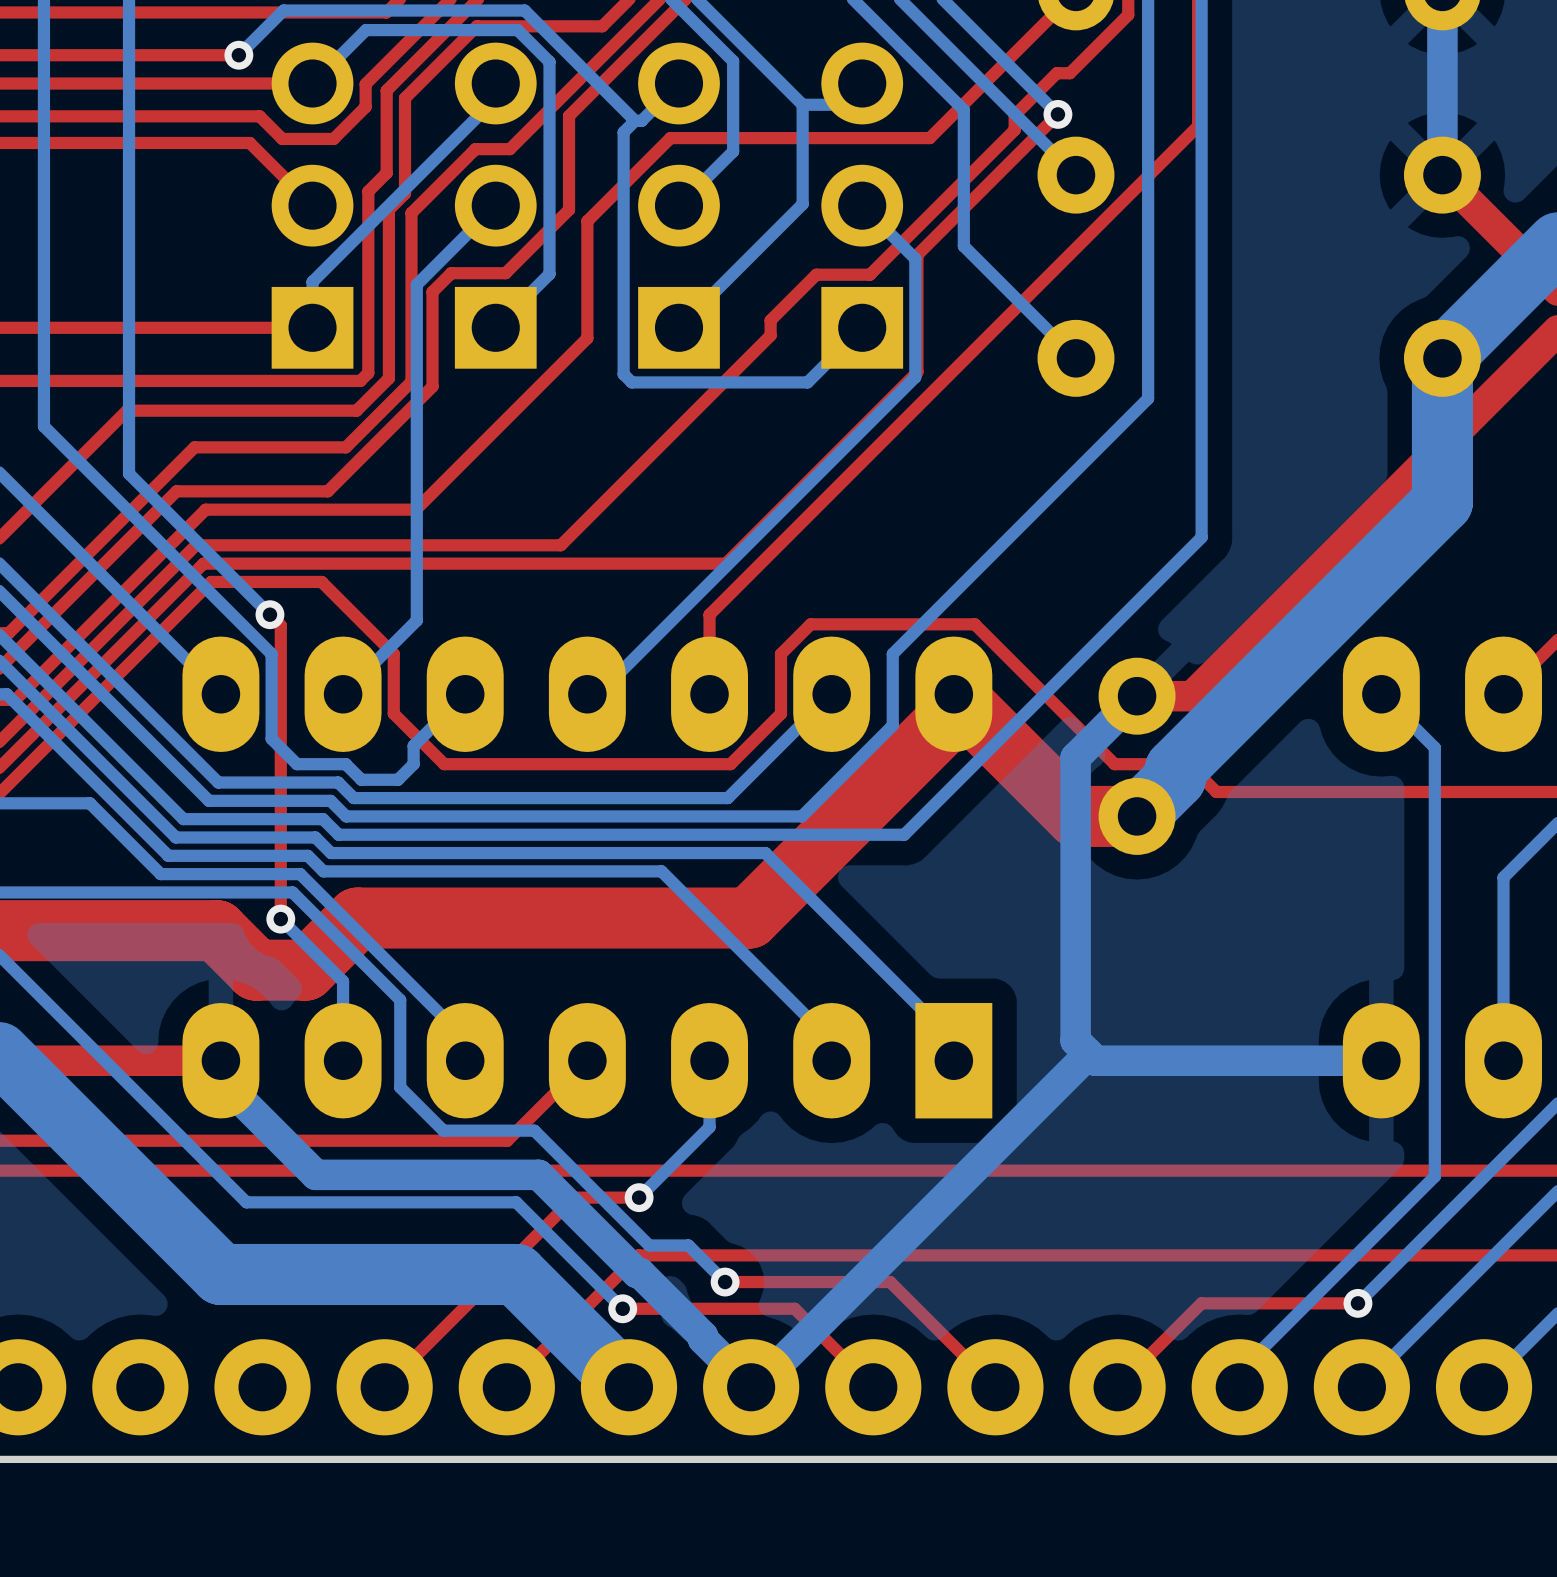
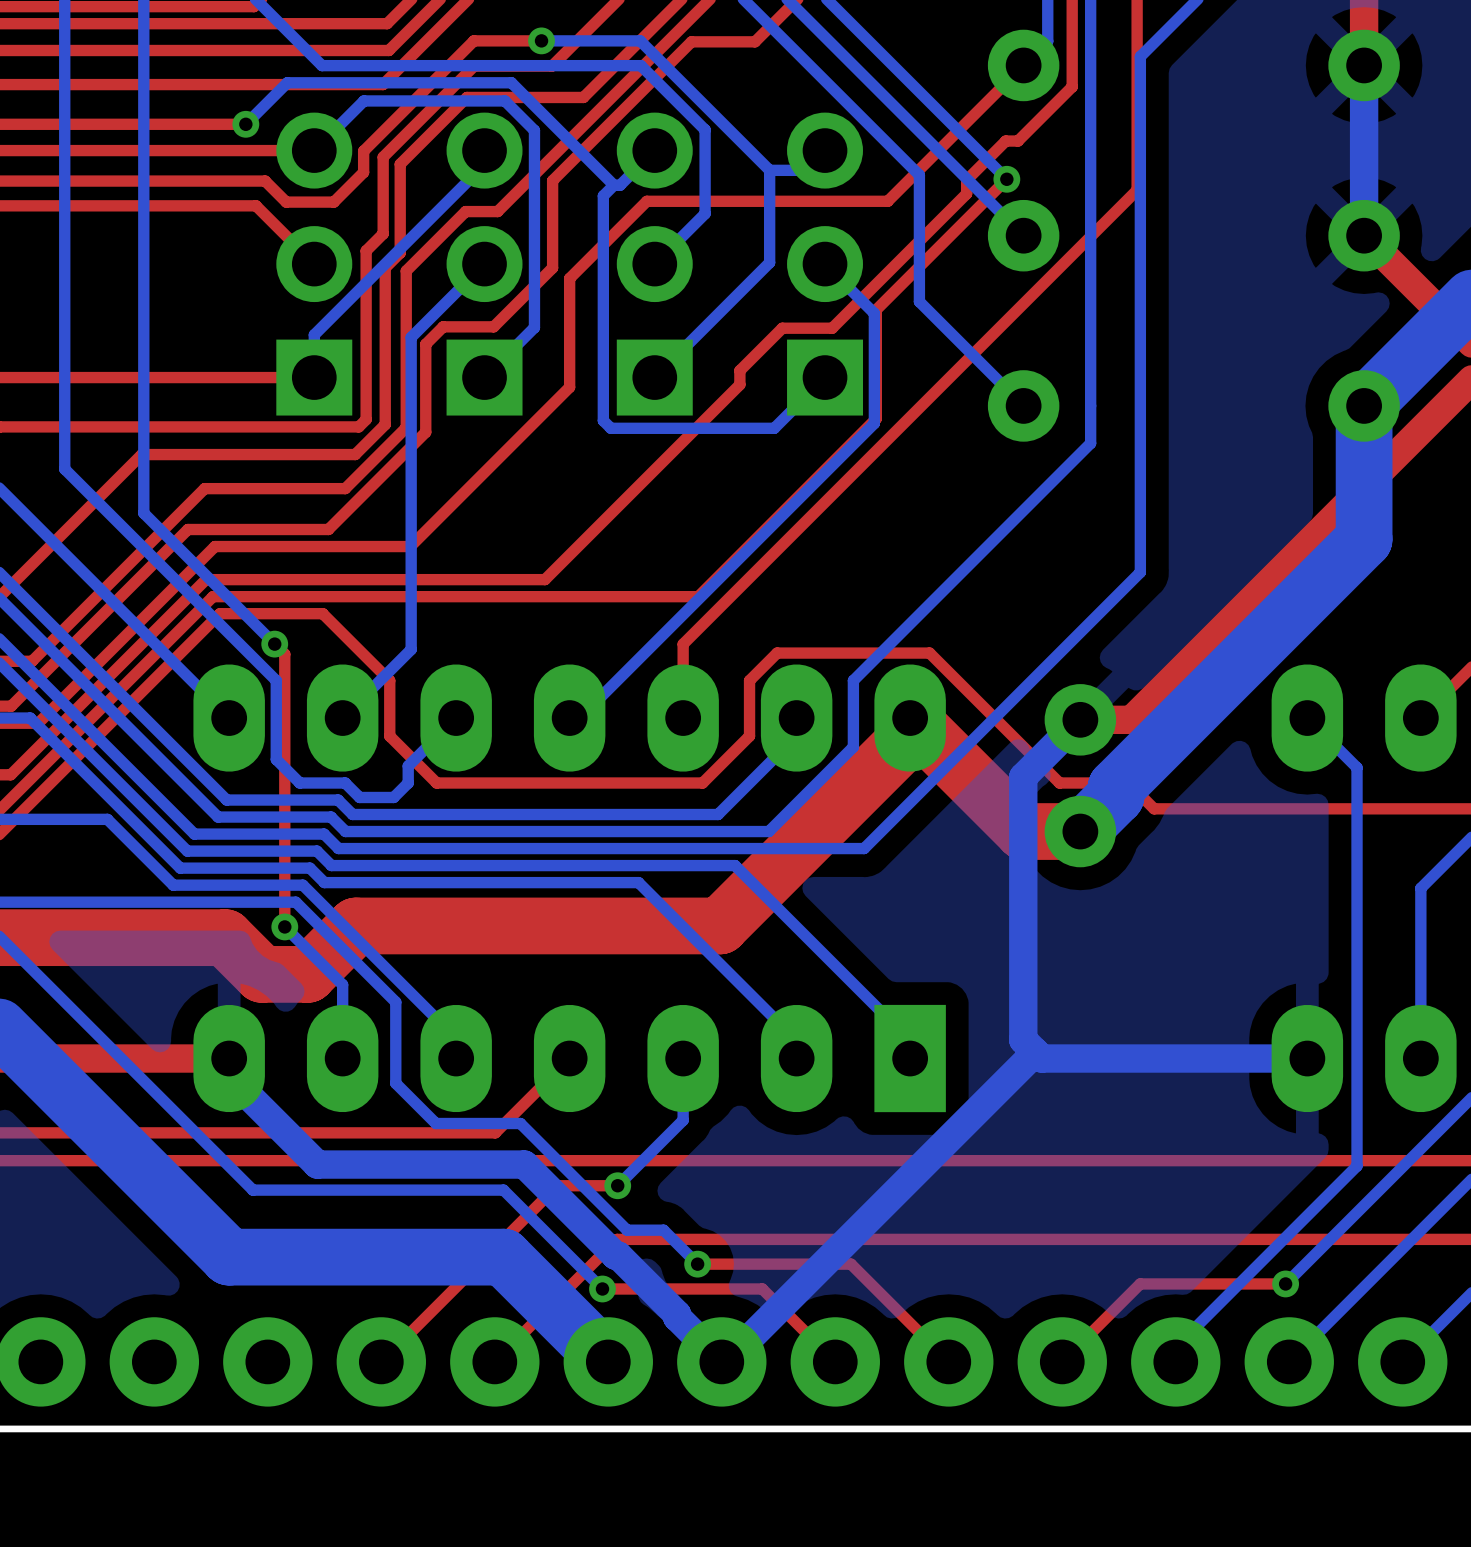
bottom track: (831, 694) (727, 798) -> (796, 735) (718, 814) (700, 814)

